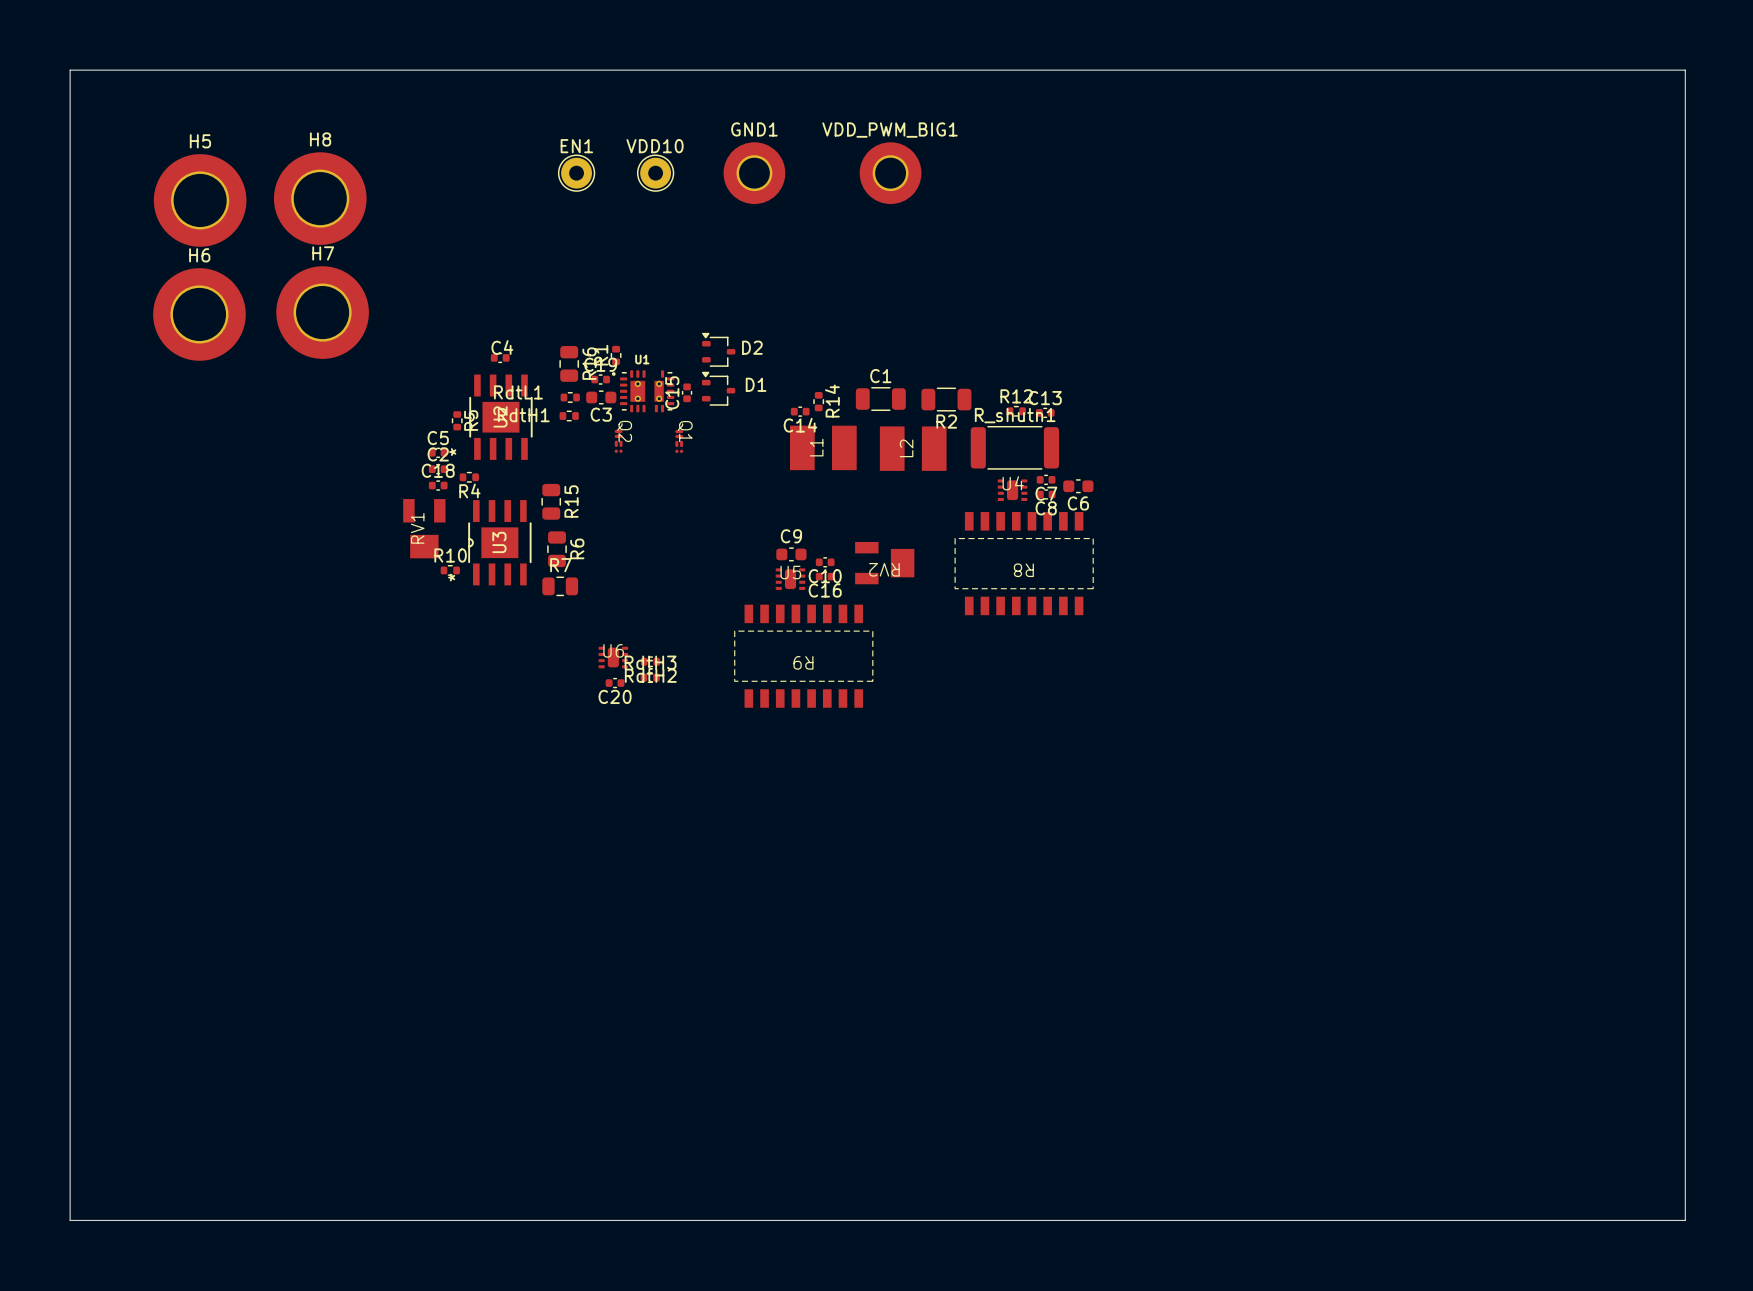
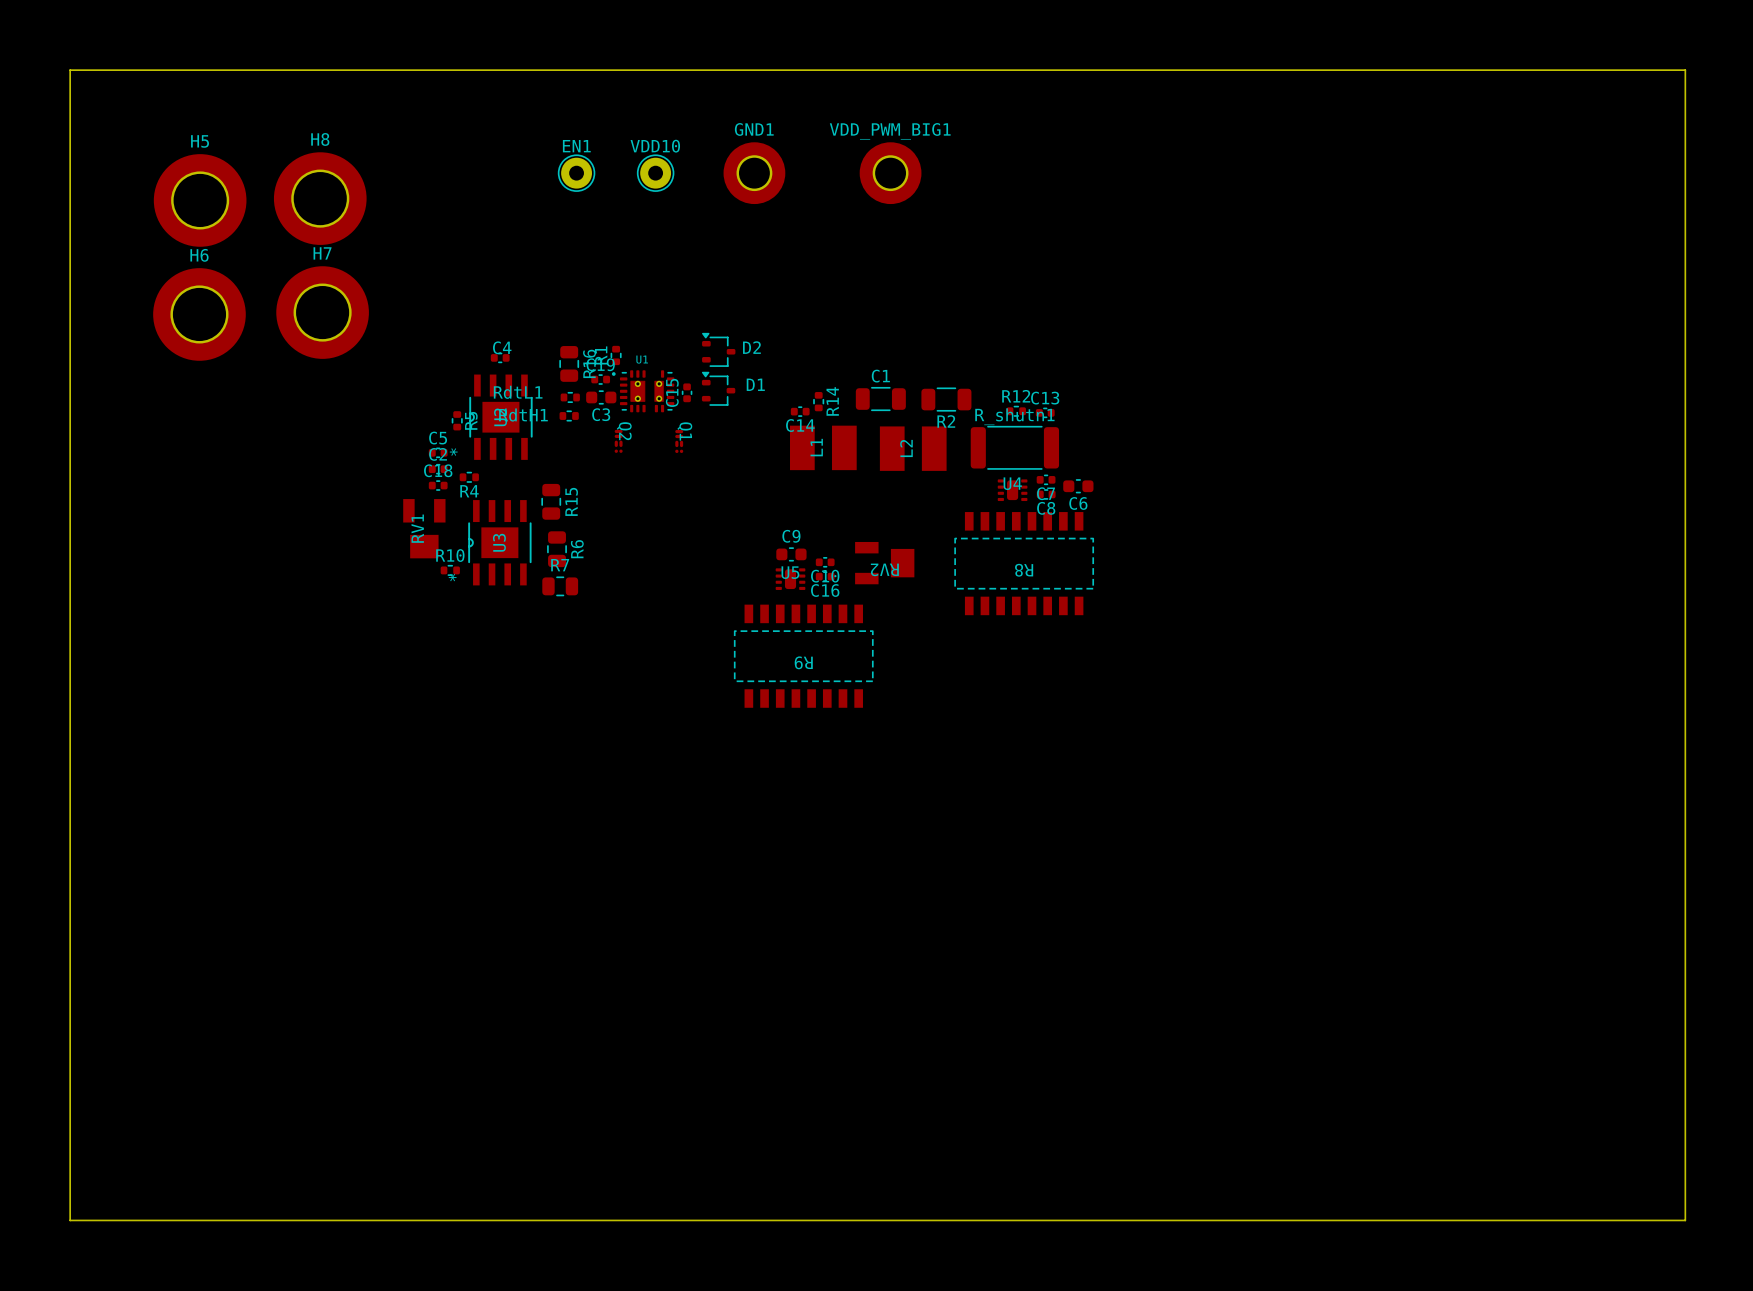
U6: (613, 657) -> none
RdtH2: (650, 661) -> none
RdtH3: (650, 677) -> none
C20: (615, 683) -> none

